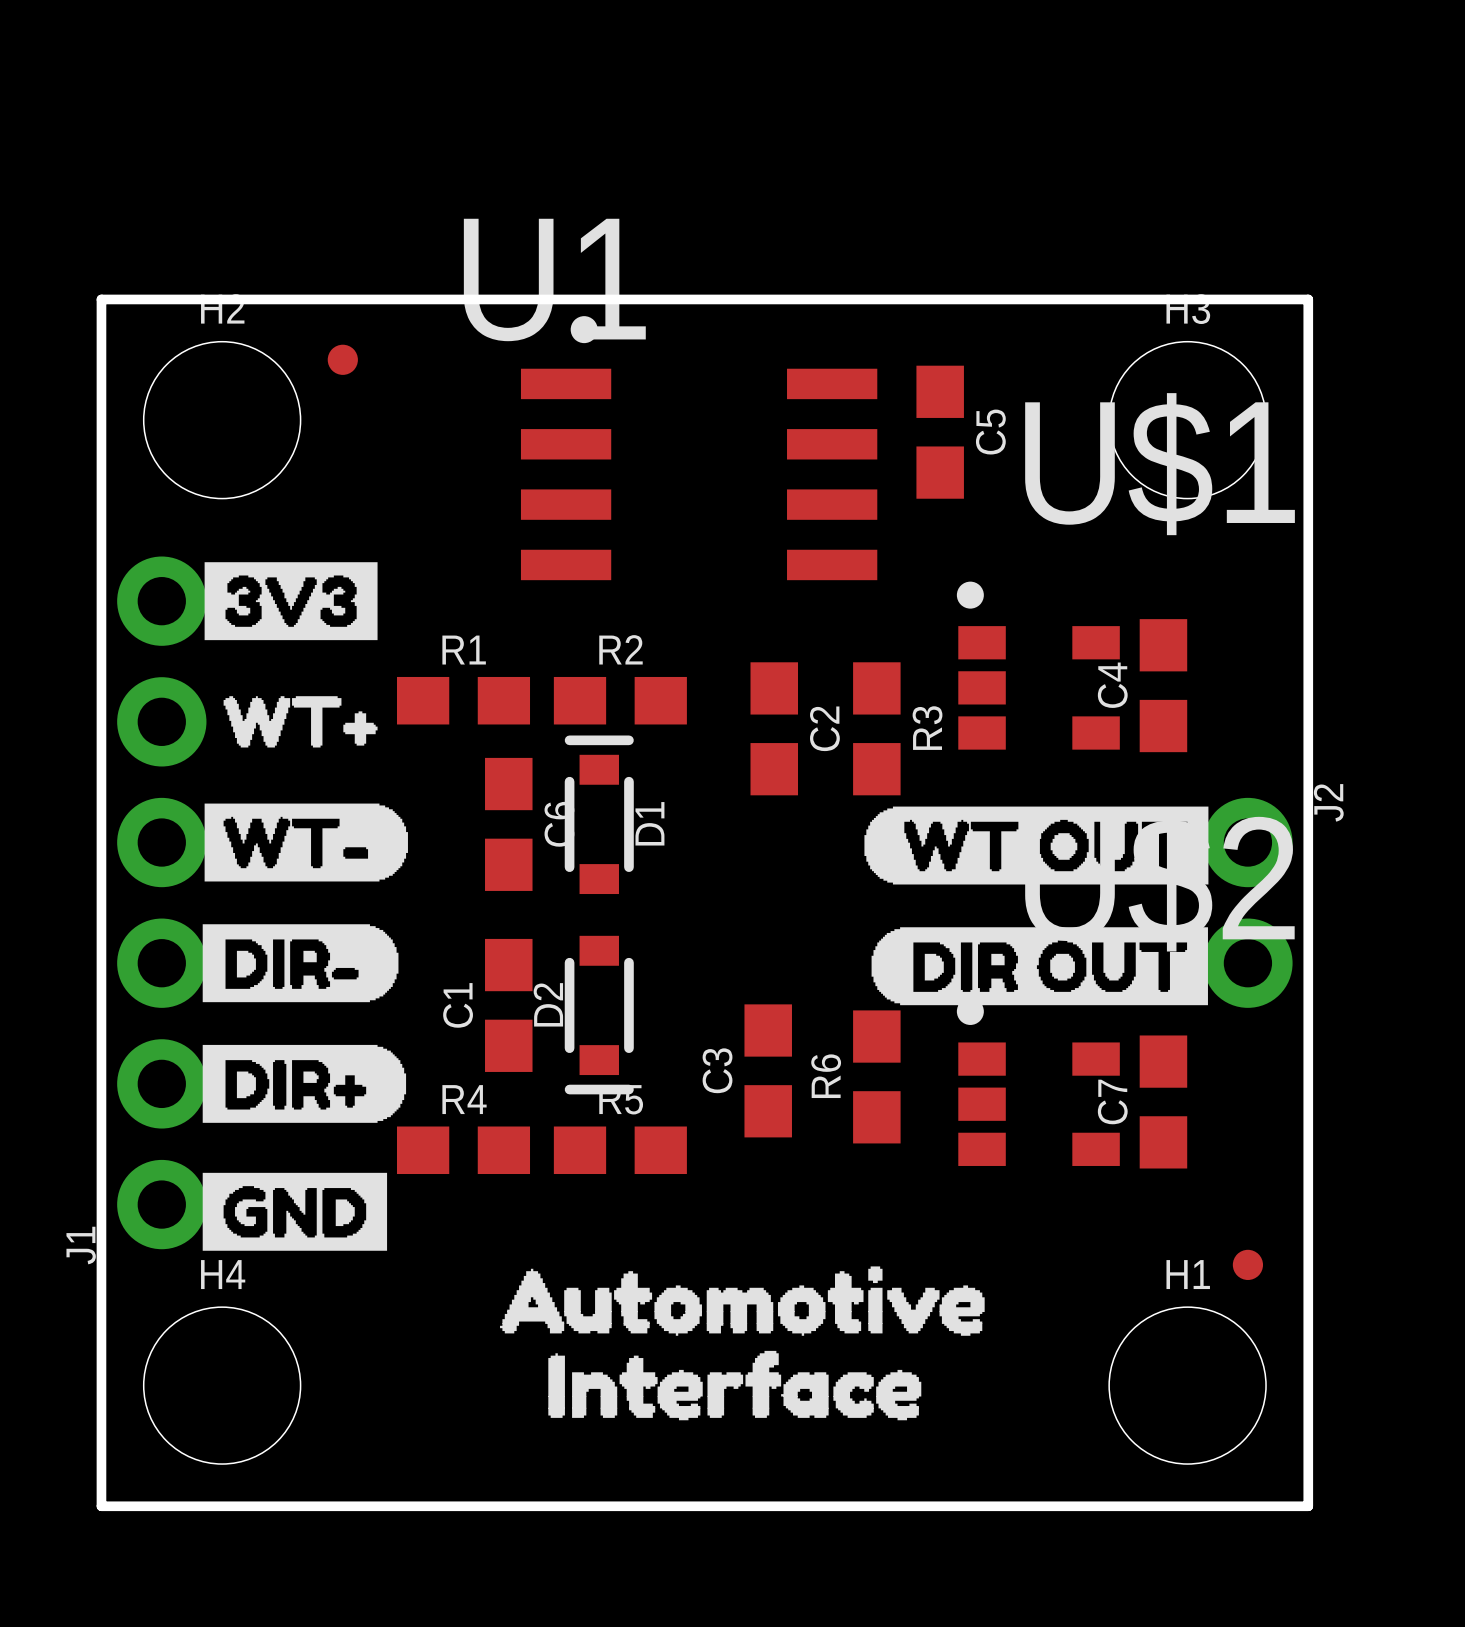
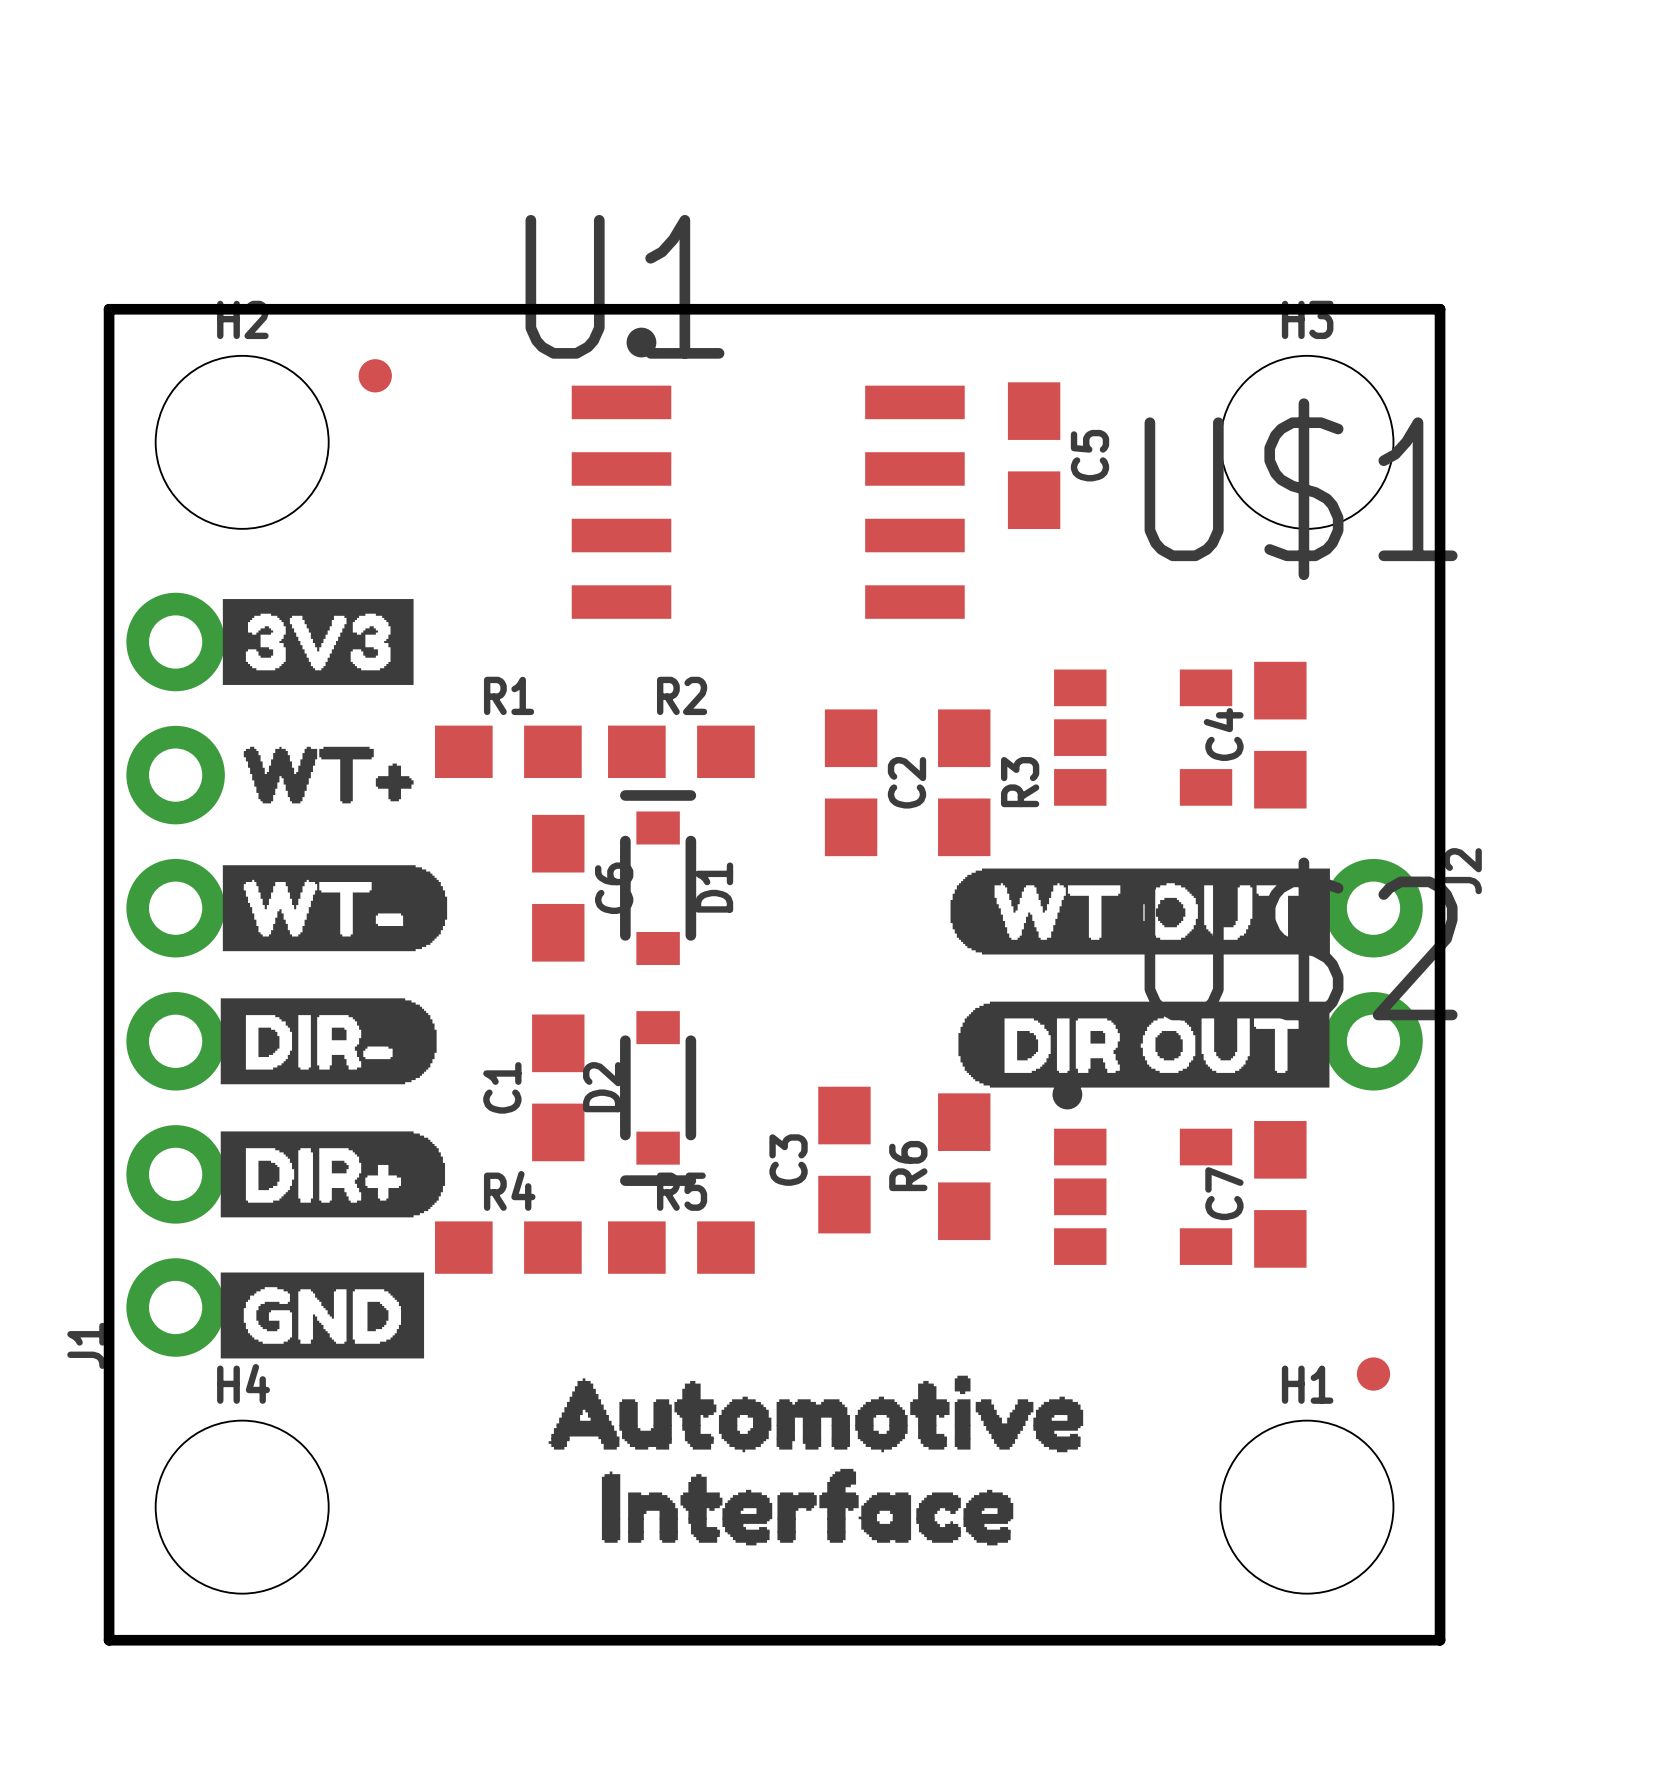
U$1 footprint: [956, 581, 1120, 750] -> [1054, 669, 1233, 806]

